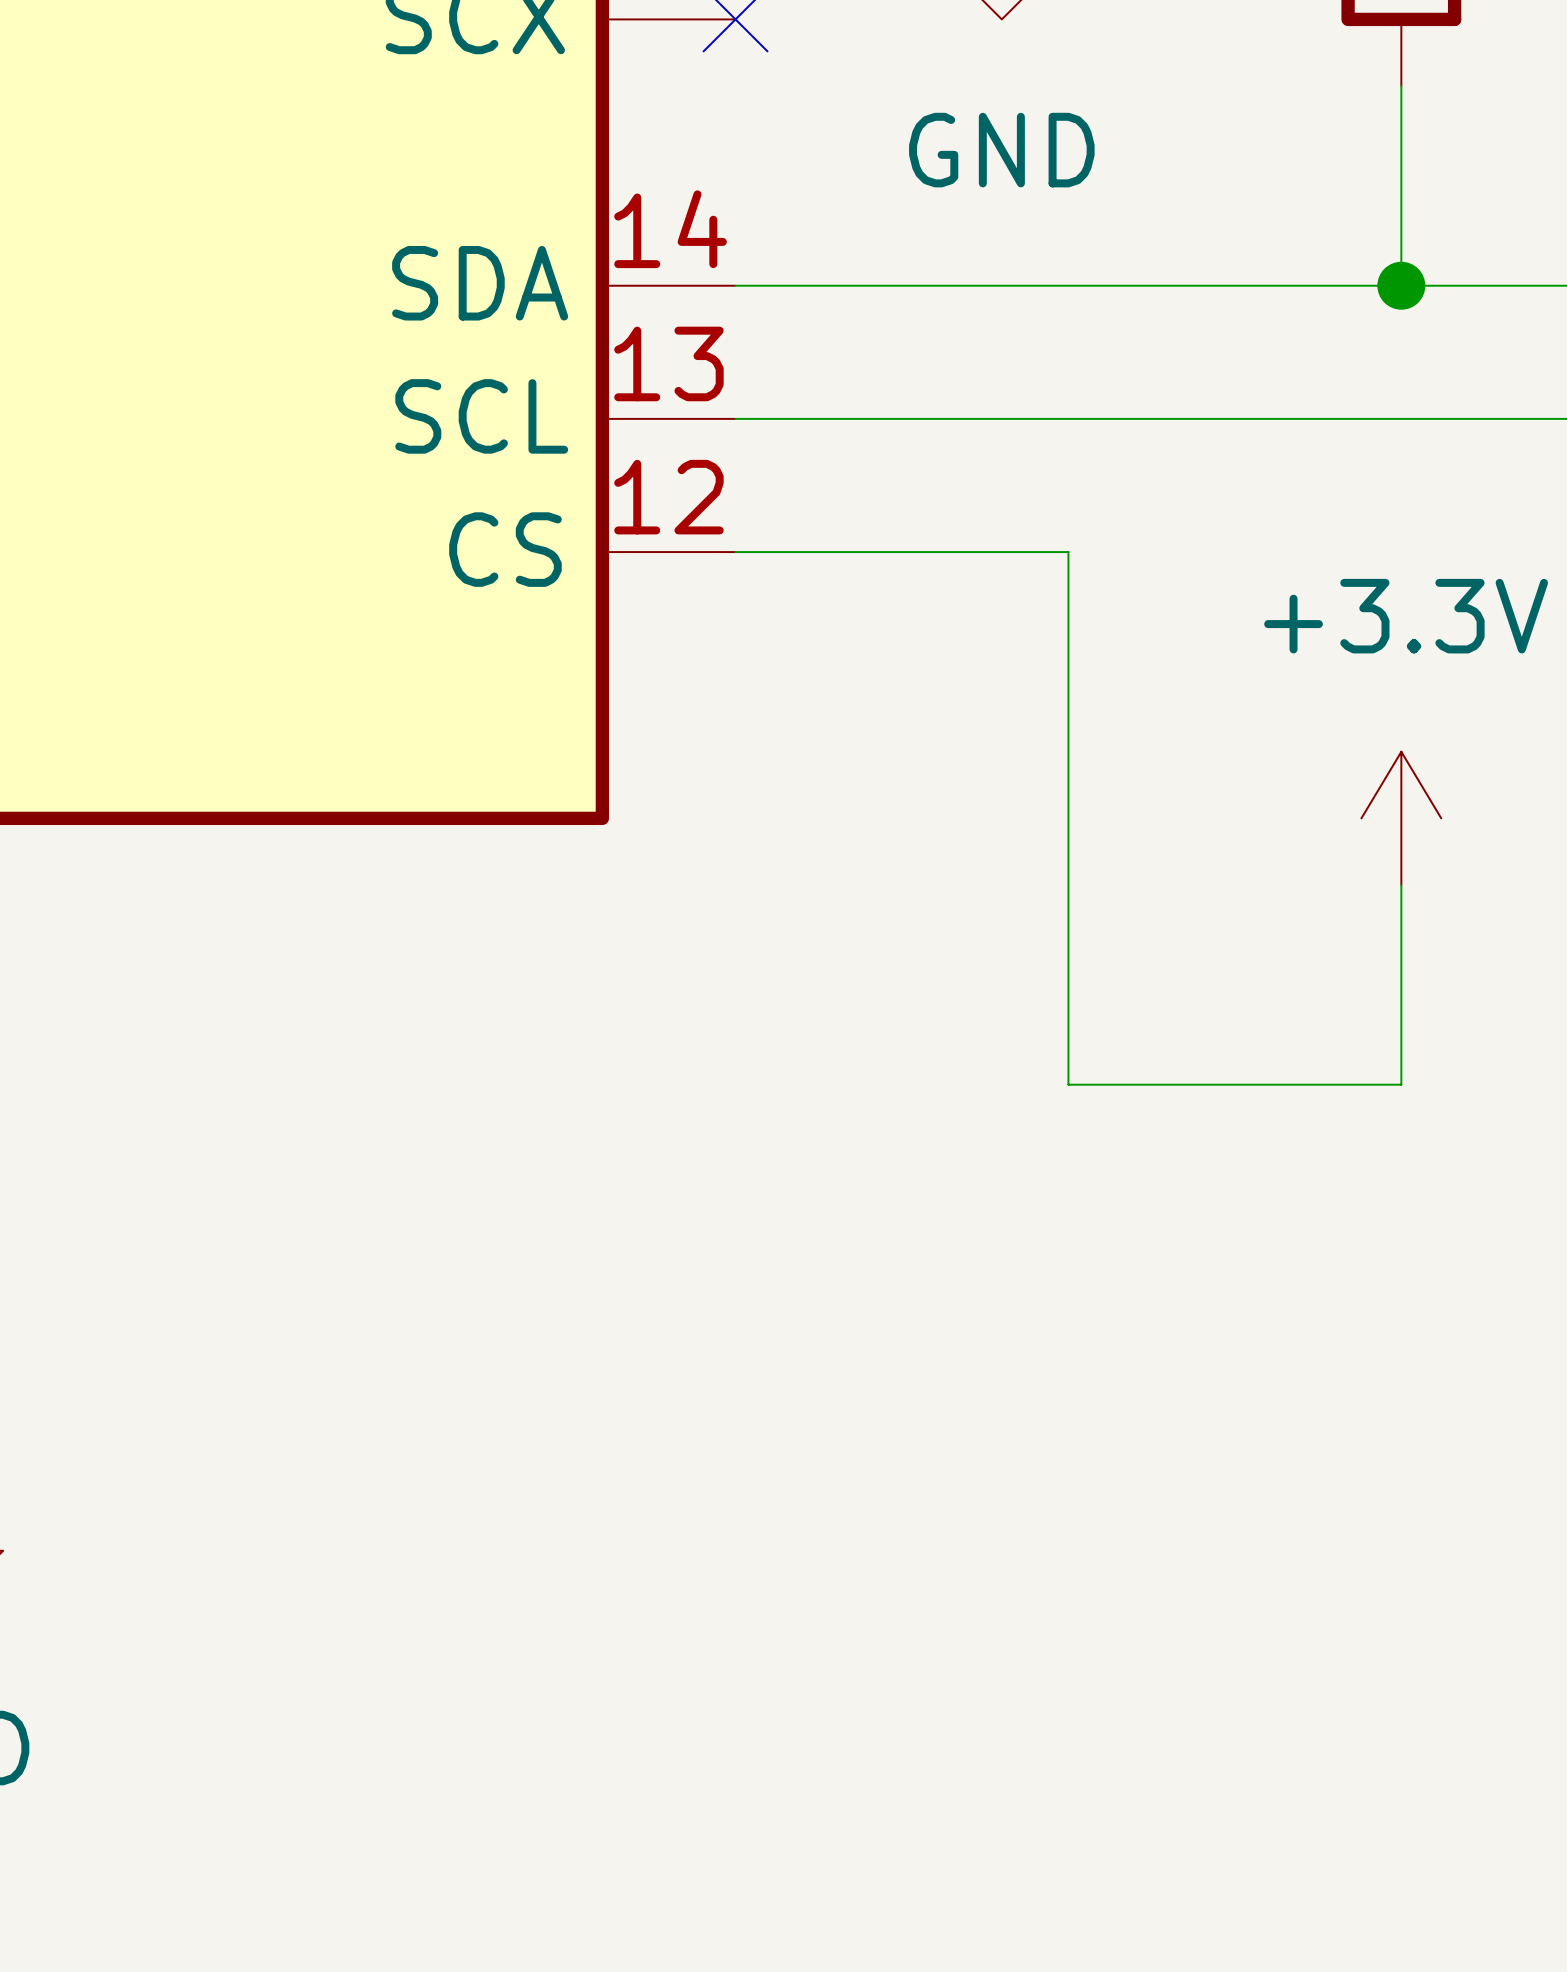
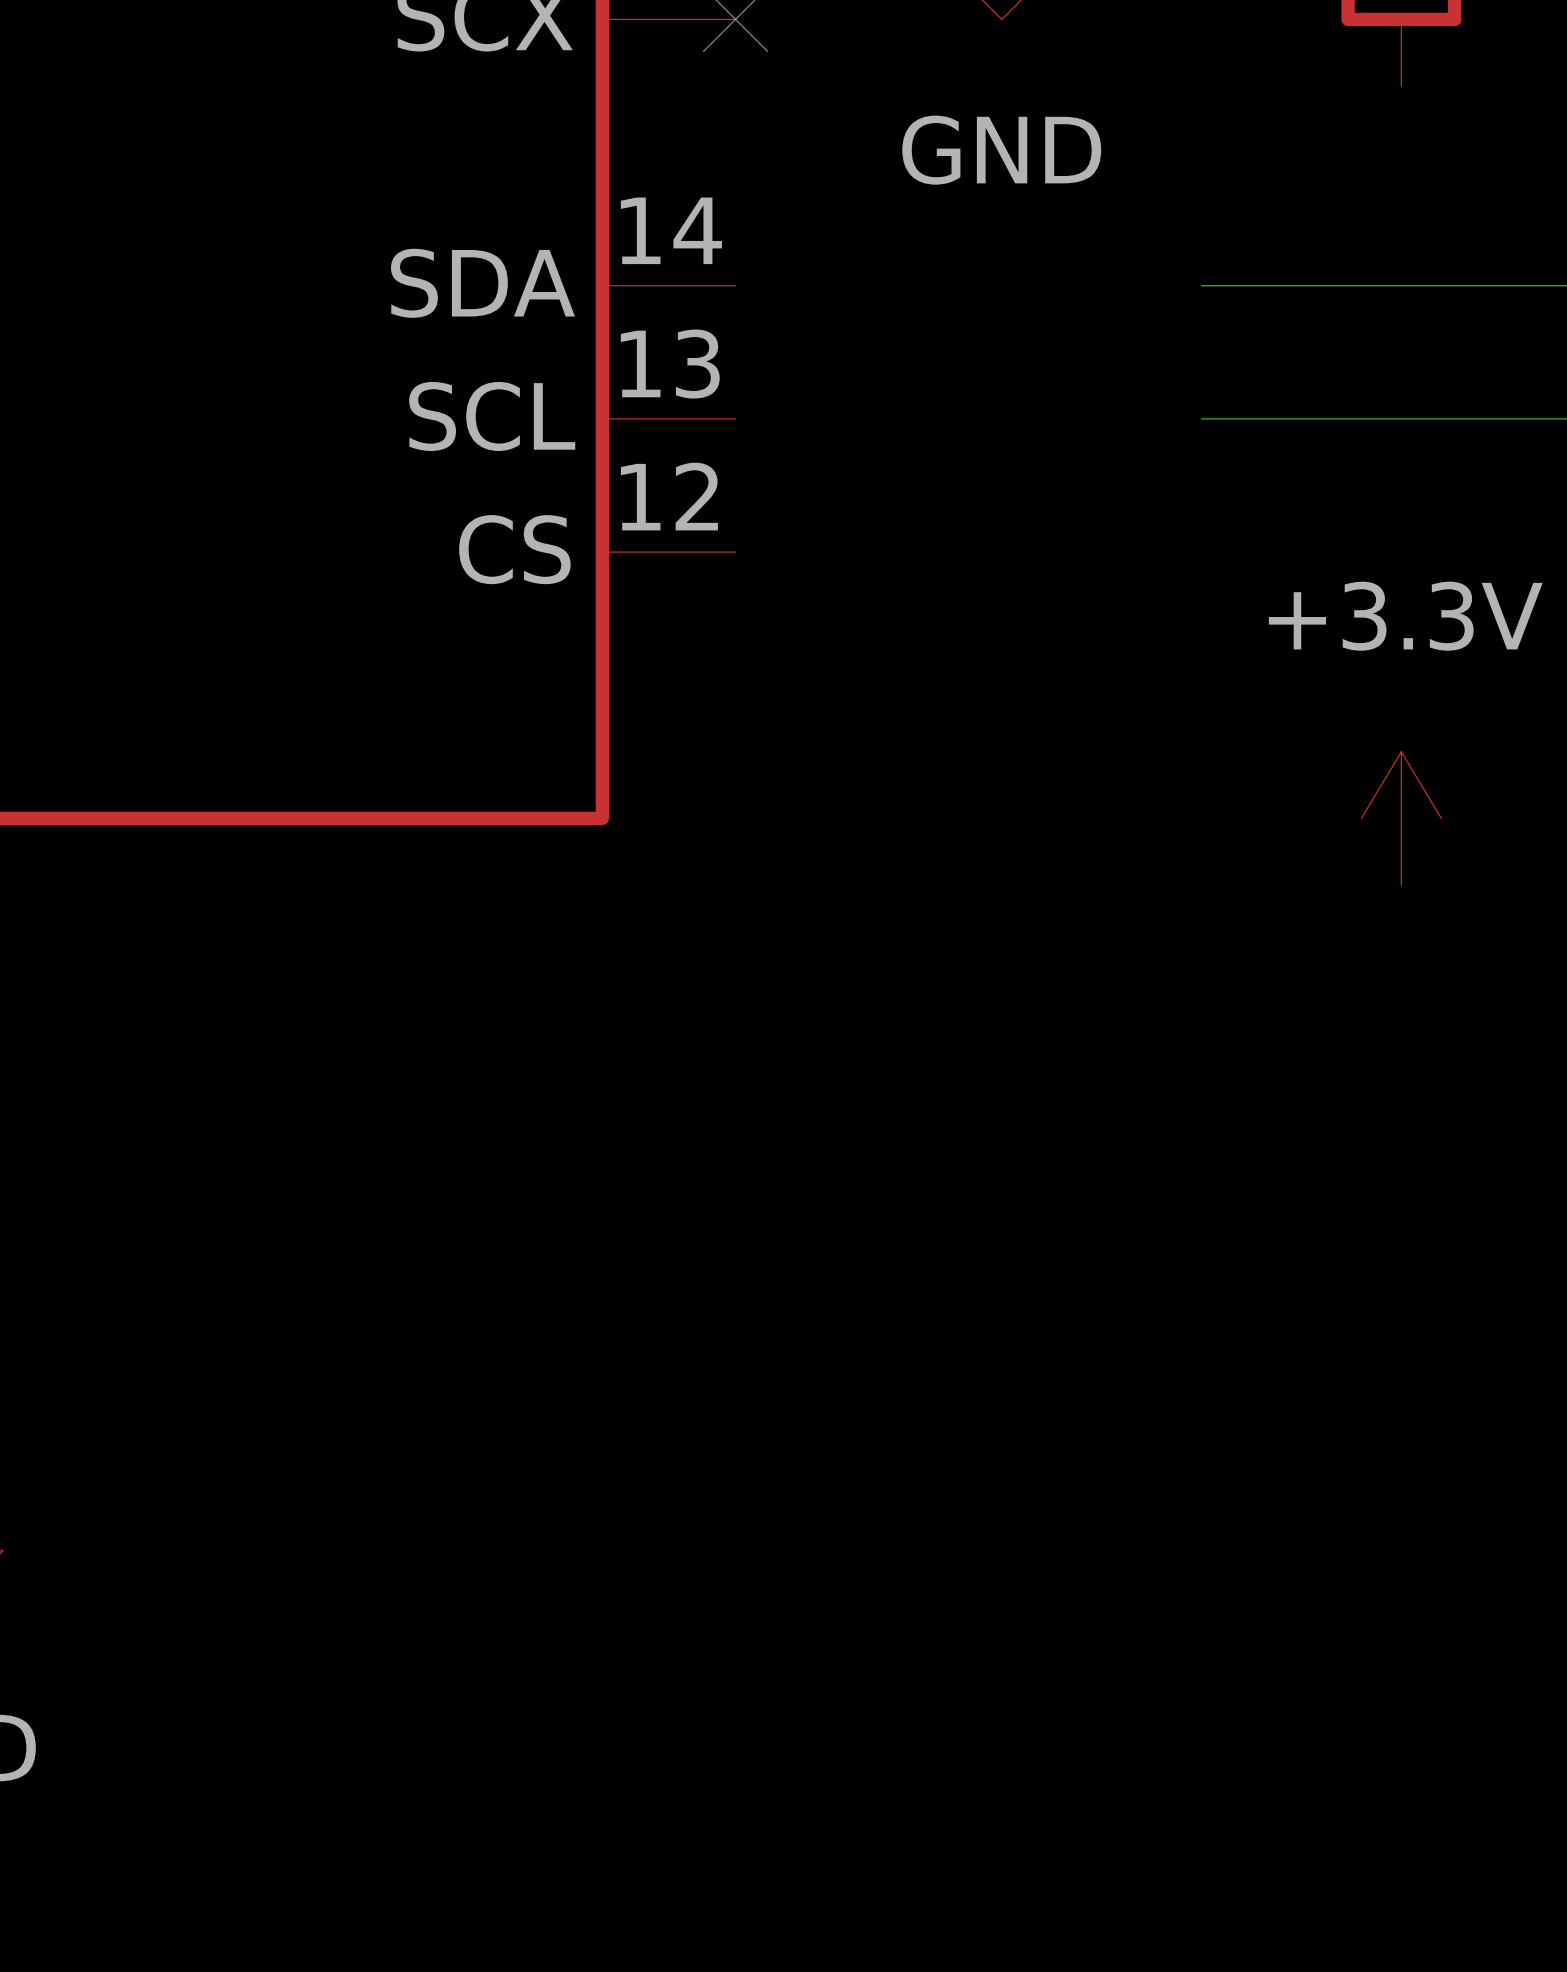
wire: (1401, 85) (1401, 285) -> none
wire: (735, 285) (1201, 285) -> none
junction: (1401, 285) -> none
wire: (735, 418) (1201, 418) -> none
wire: (735, 552) (1068, 552) (1068, 1084) (1401, 1084) (1401, 884) -> none

